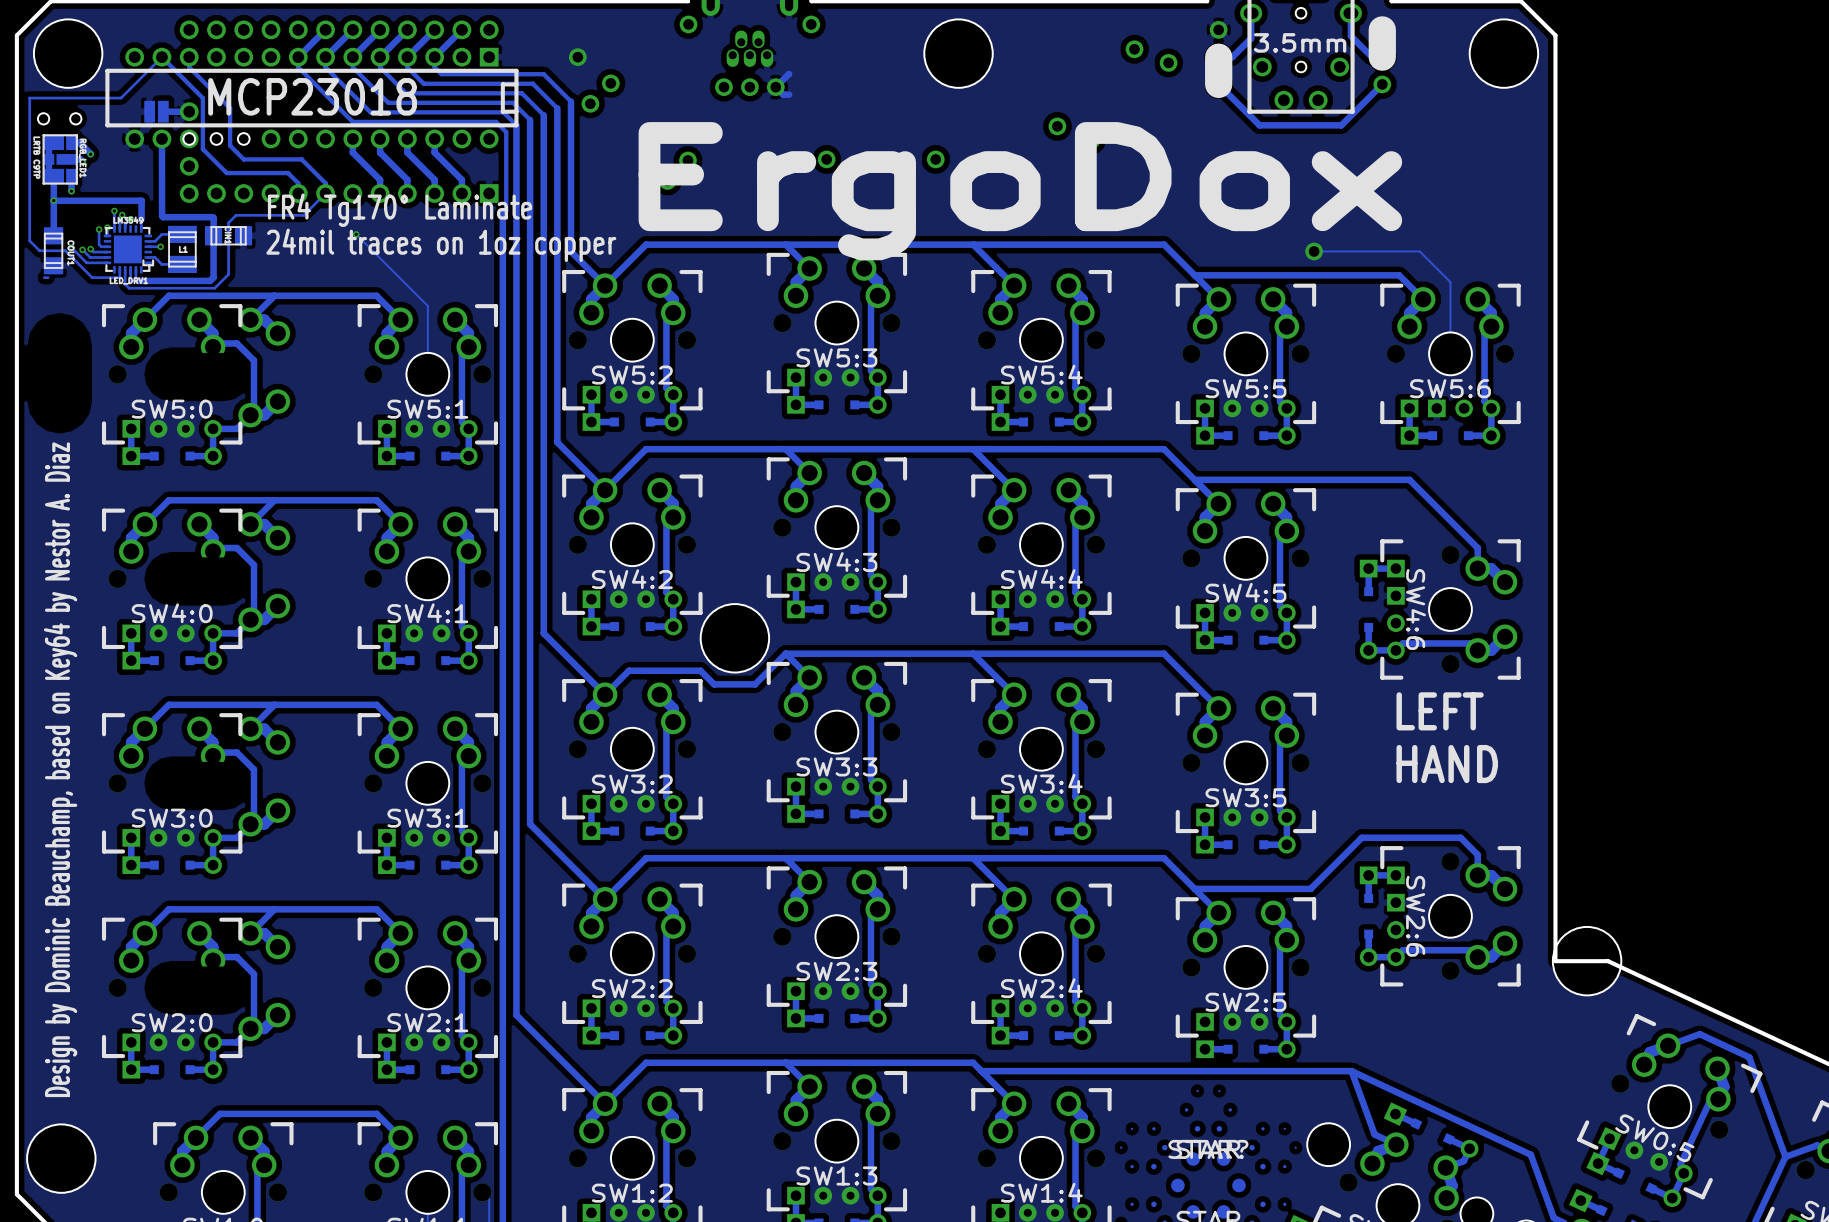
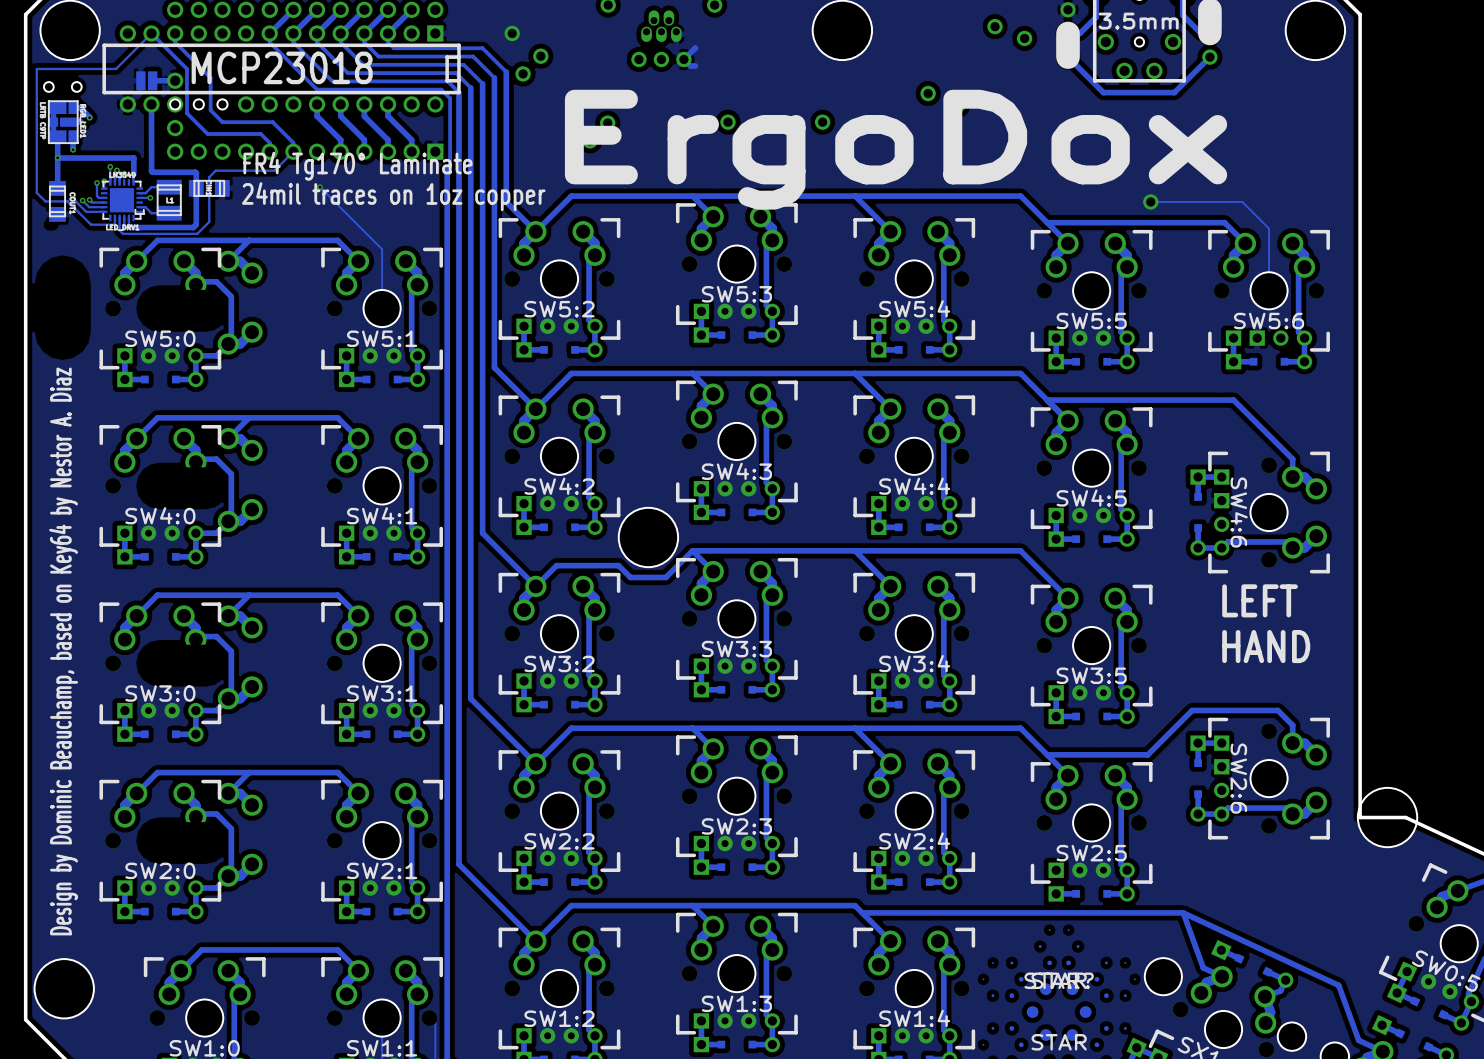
track: (48, 277) (44, 277) -> none

